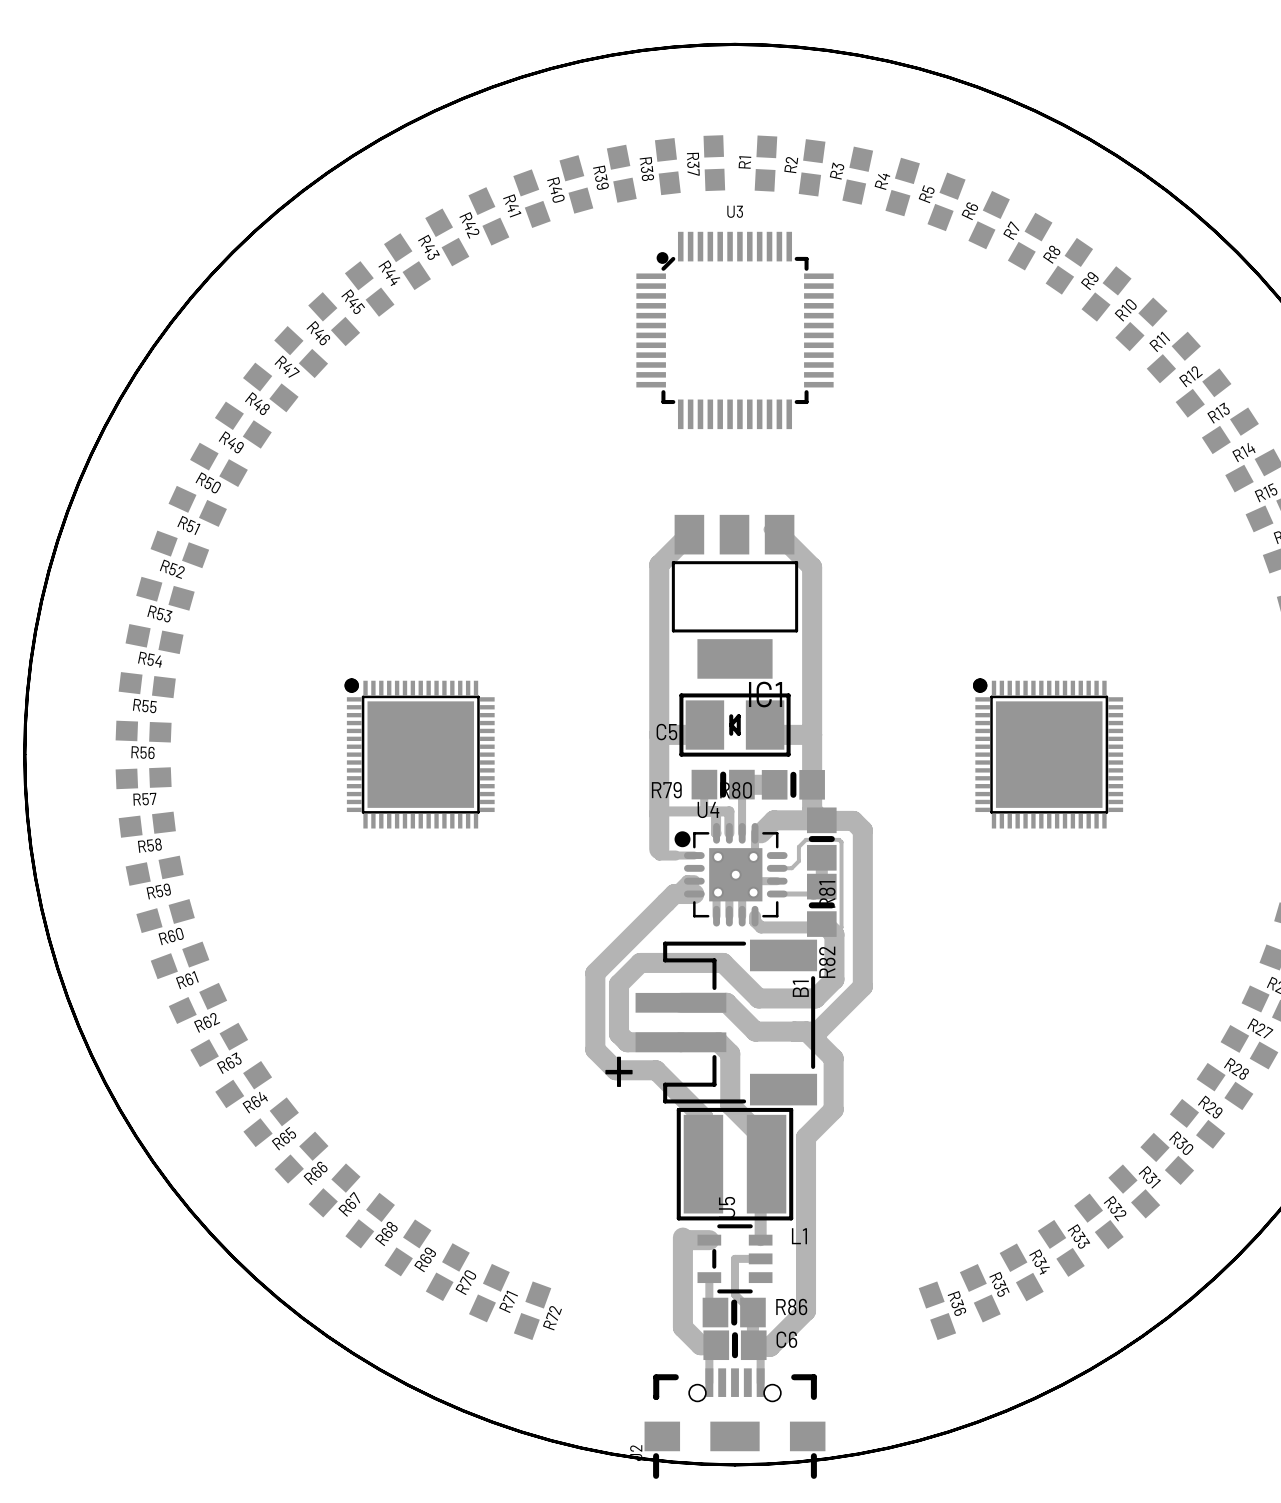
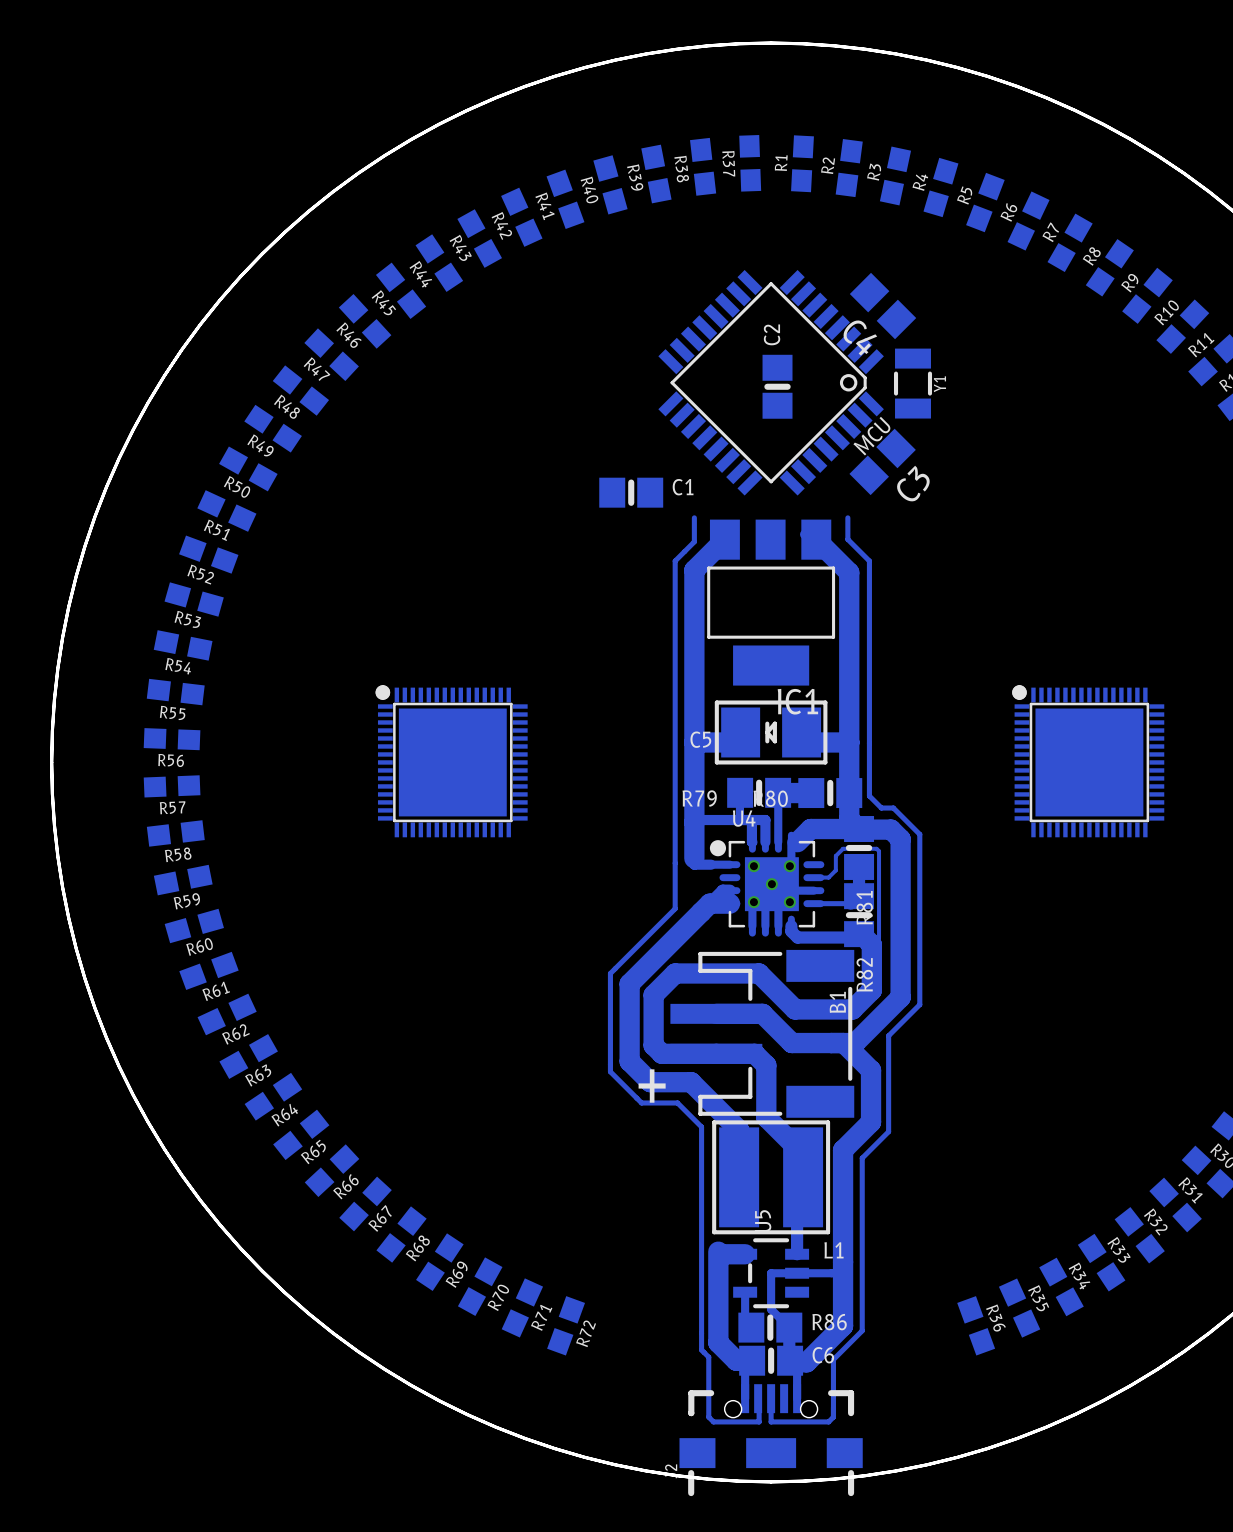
C4: none -> (883, 306)
U3: (735, 330) -> none
MCU: none -> (771, 382)
Y1: none -> (913, 383)
C2: none -> (777, 386)
C3: none -> (882, 461)
C1: none -> (631, 492)
track: none -> (694, 517) (694, 541) (675, 561) (675, 908) (610, 973) (610, 1071) (641, 1102) (677, 1102) (701, 1126) (701, 1349) (708, 1357) (708, 1417) (713, 1421) (759, 1421) (759, 1400)
track: none -> (847, 517) (847, 539) (869, 561) (869, 796) (881, 808) (893, 808) (919, 834) (919, 1004) (888, 1035) (888, 1131) (862, 1158) (862, 1330) (833, 1359) (833, 1417) (828, 1421) (771, 1421) (771, 1401)
track: none -> (843, 1262) (840, 1268) (834, 1272) (797, 1273)

